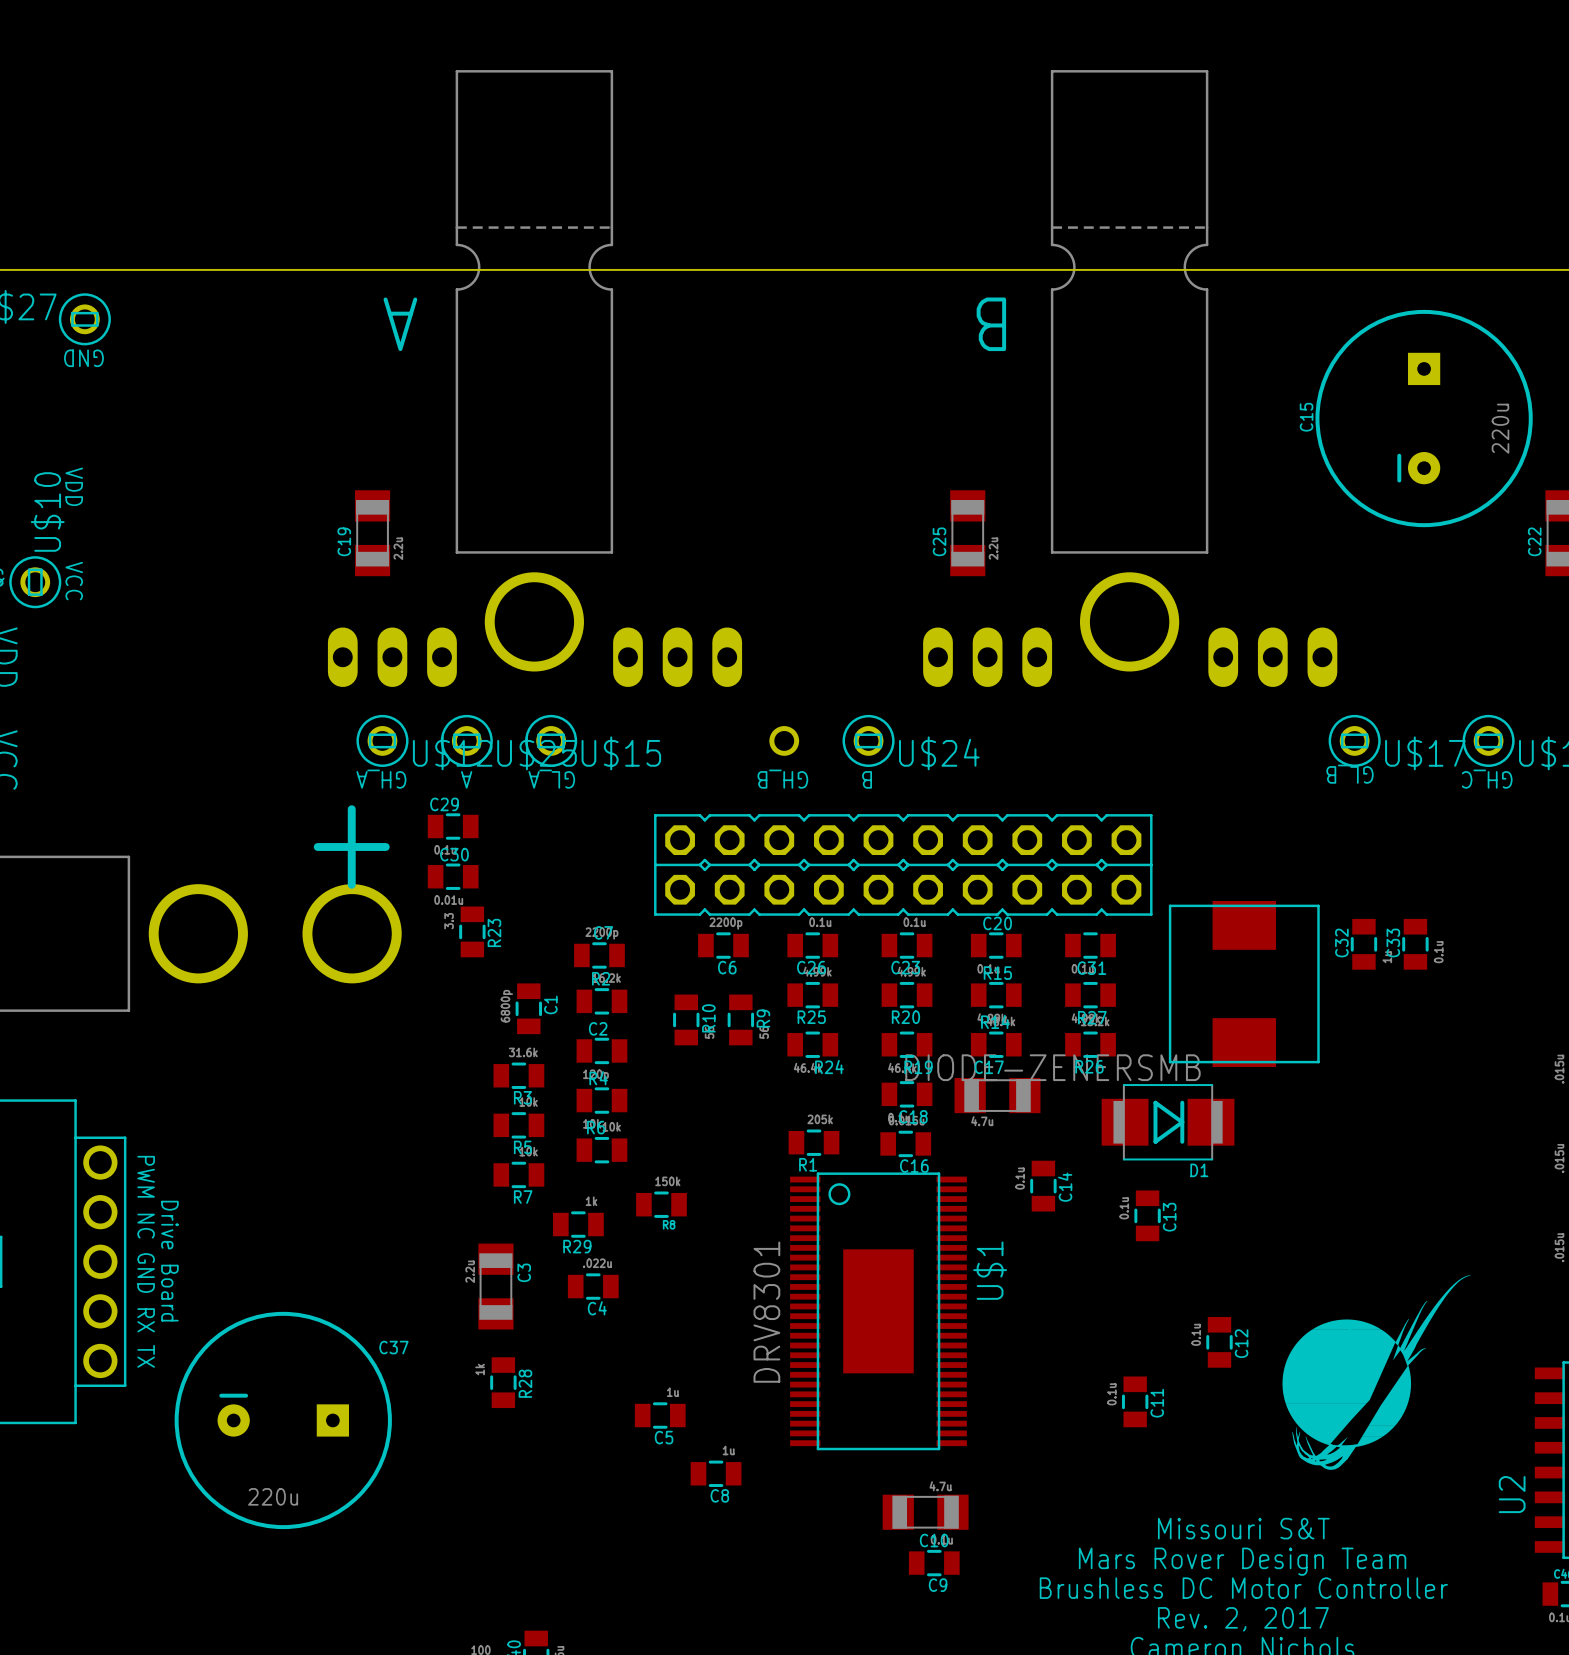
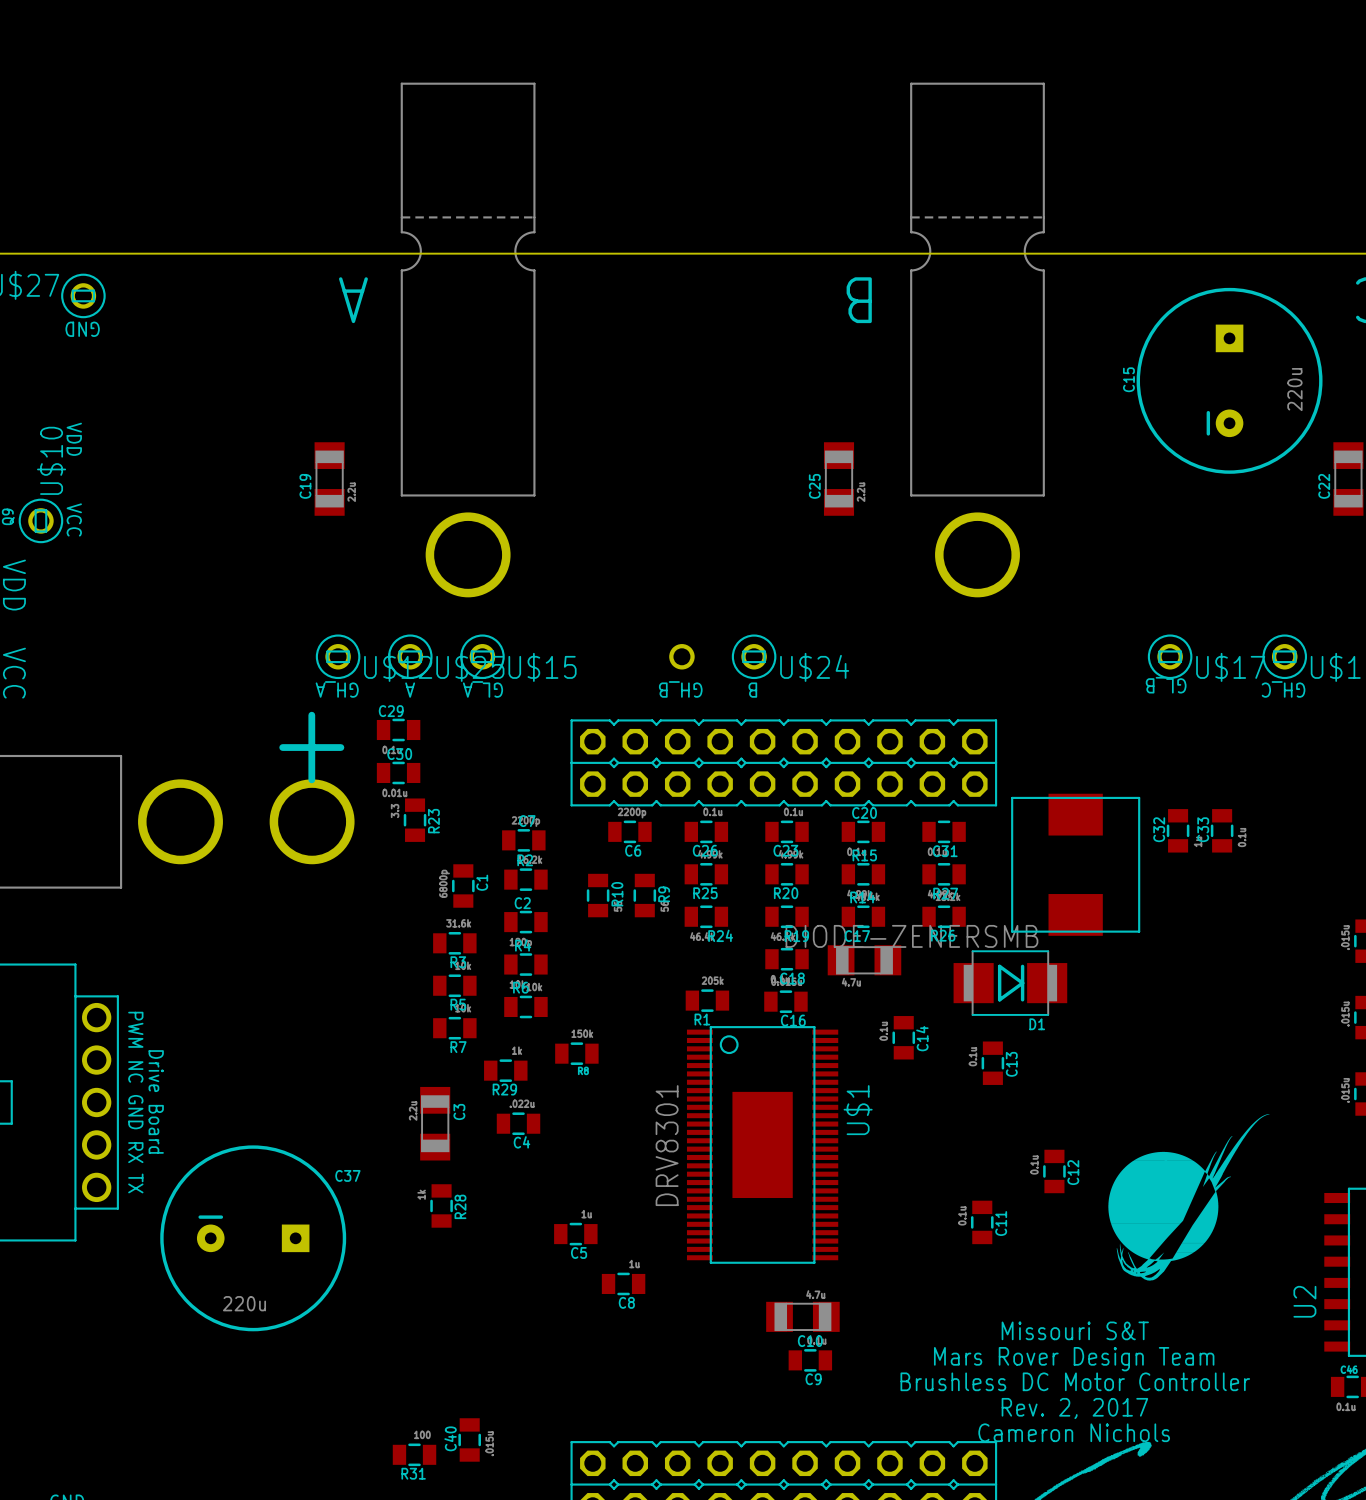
part: (392, 657) -> none
part: (677, 657) -> none
part: (987, 657) -> none
part: (1272, 657) -> none

